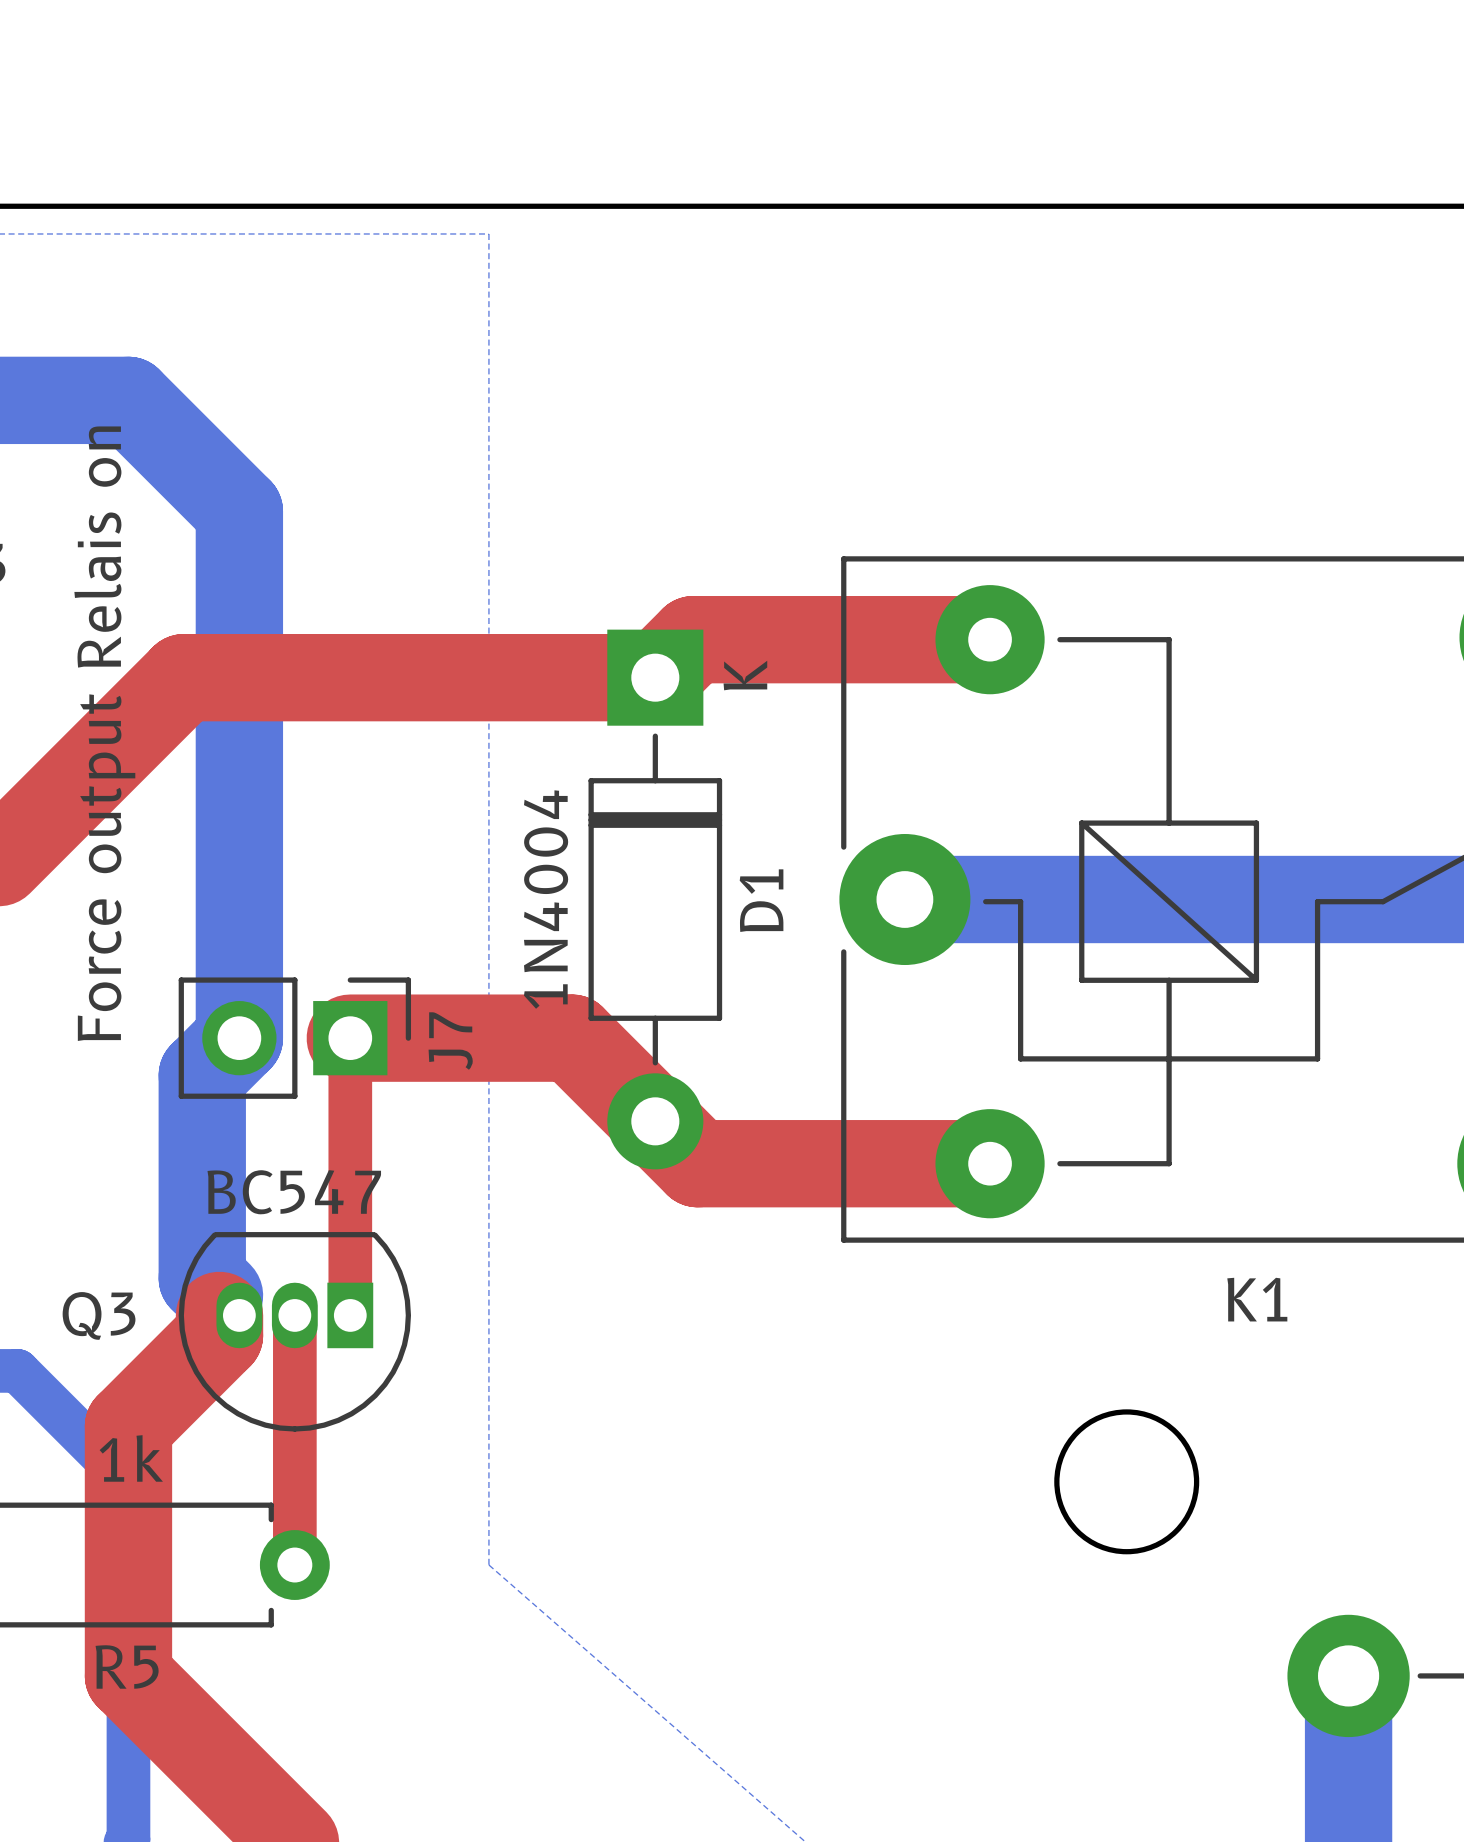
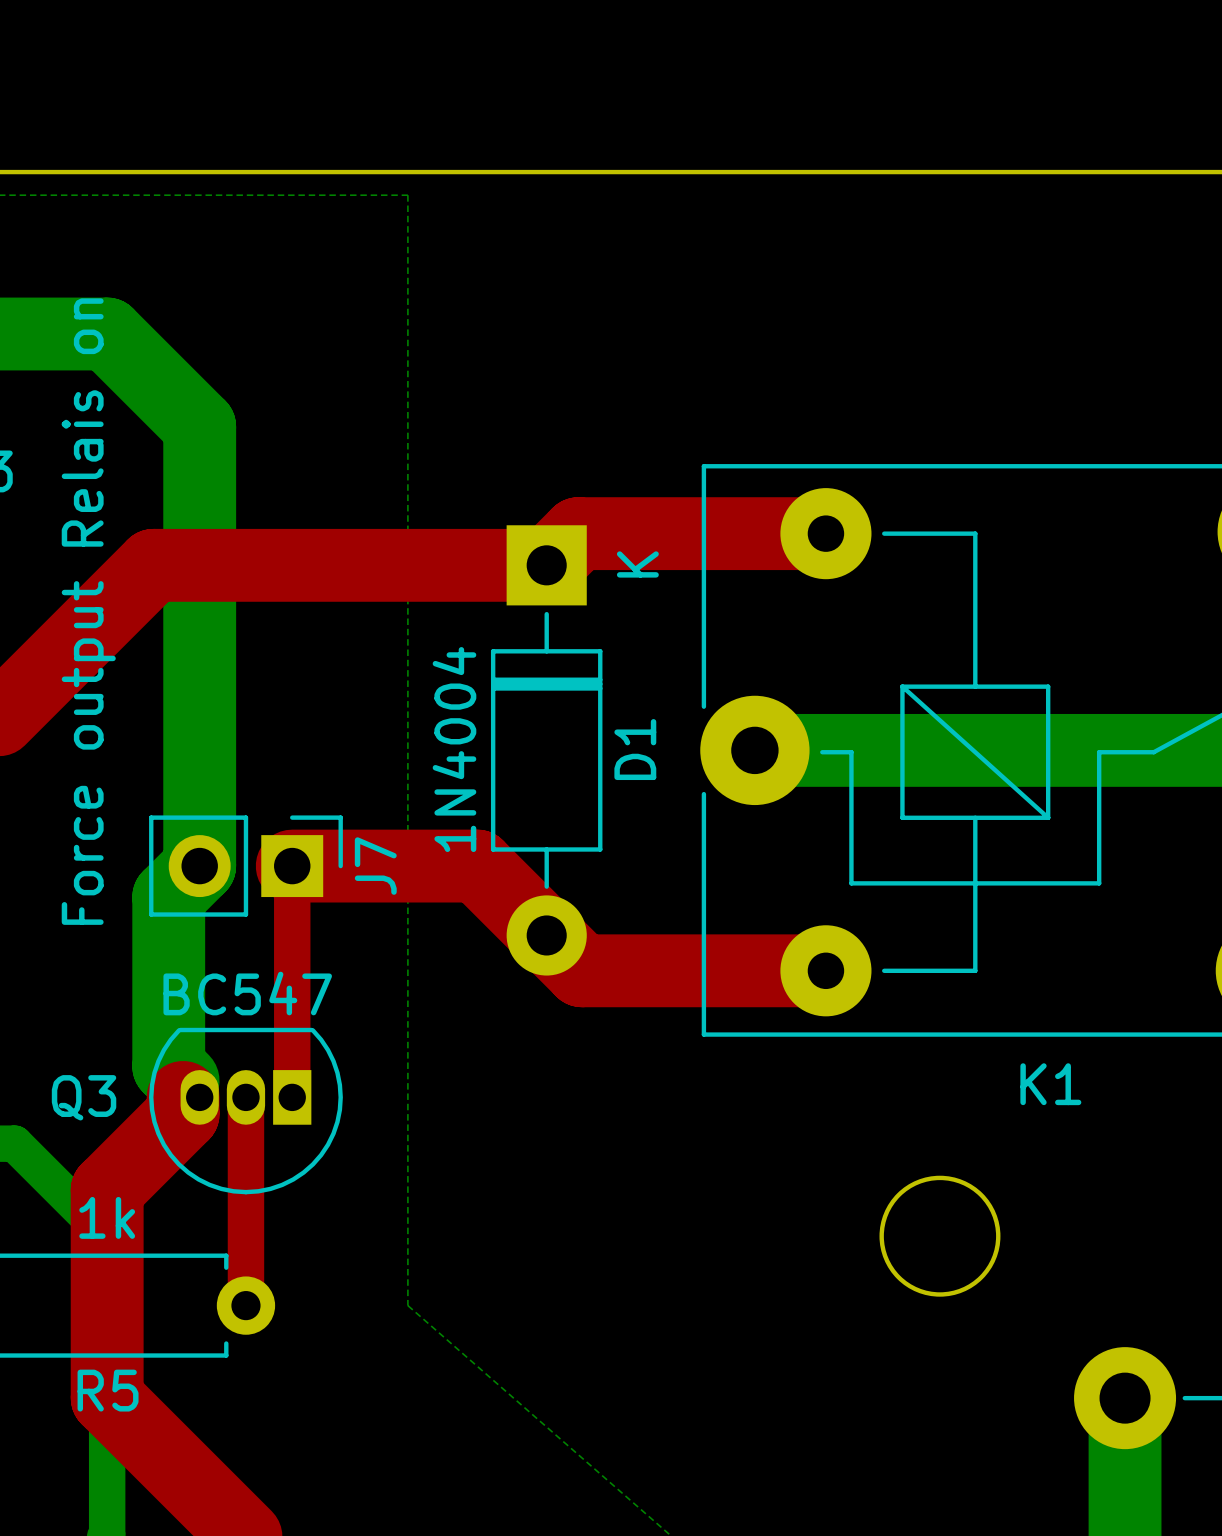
D1 text position: K (745, 675) -> K (637, 564)

